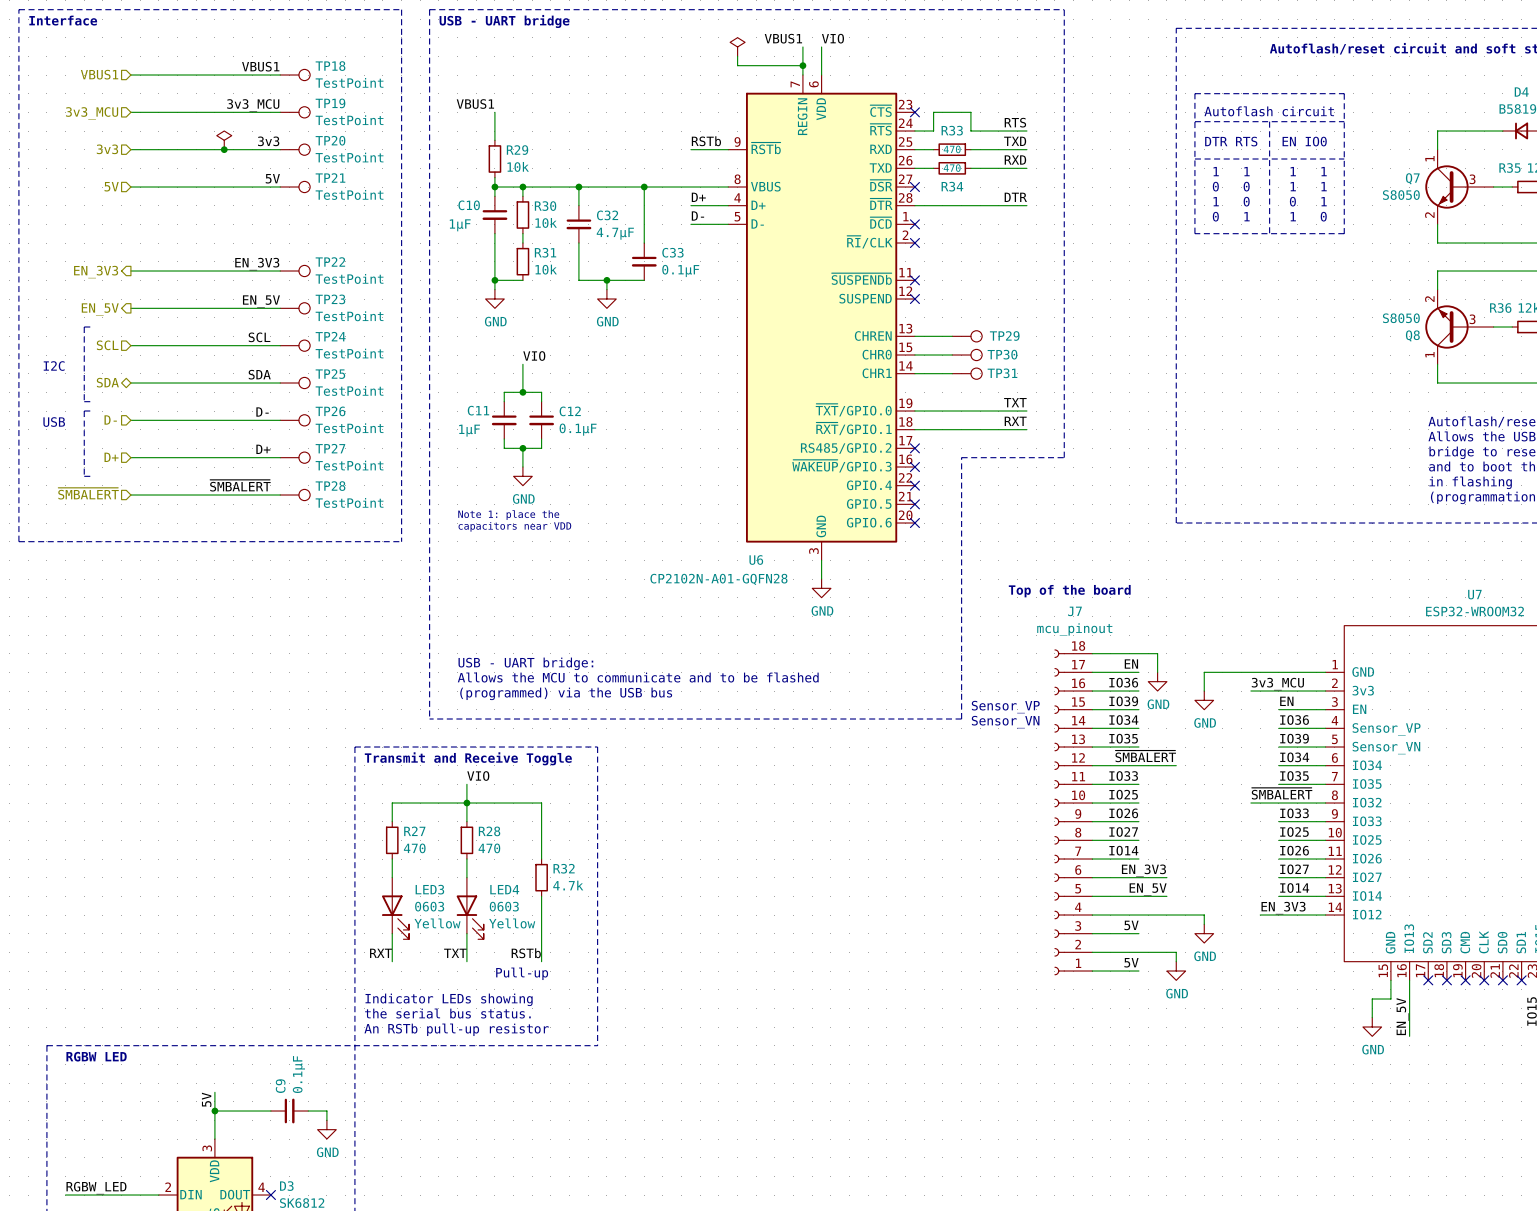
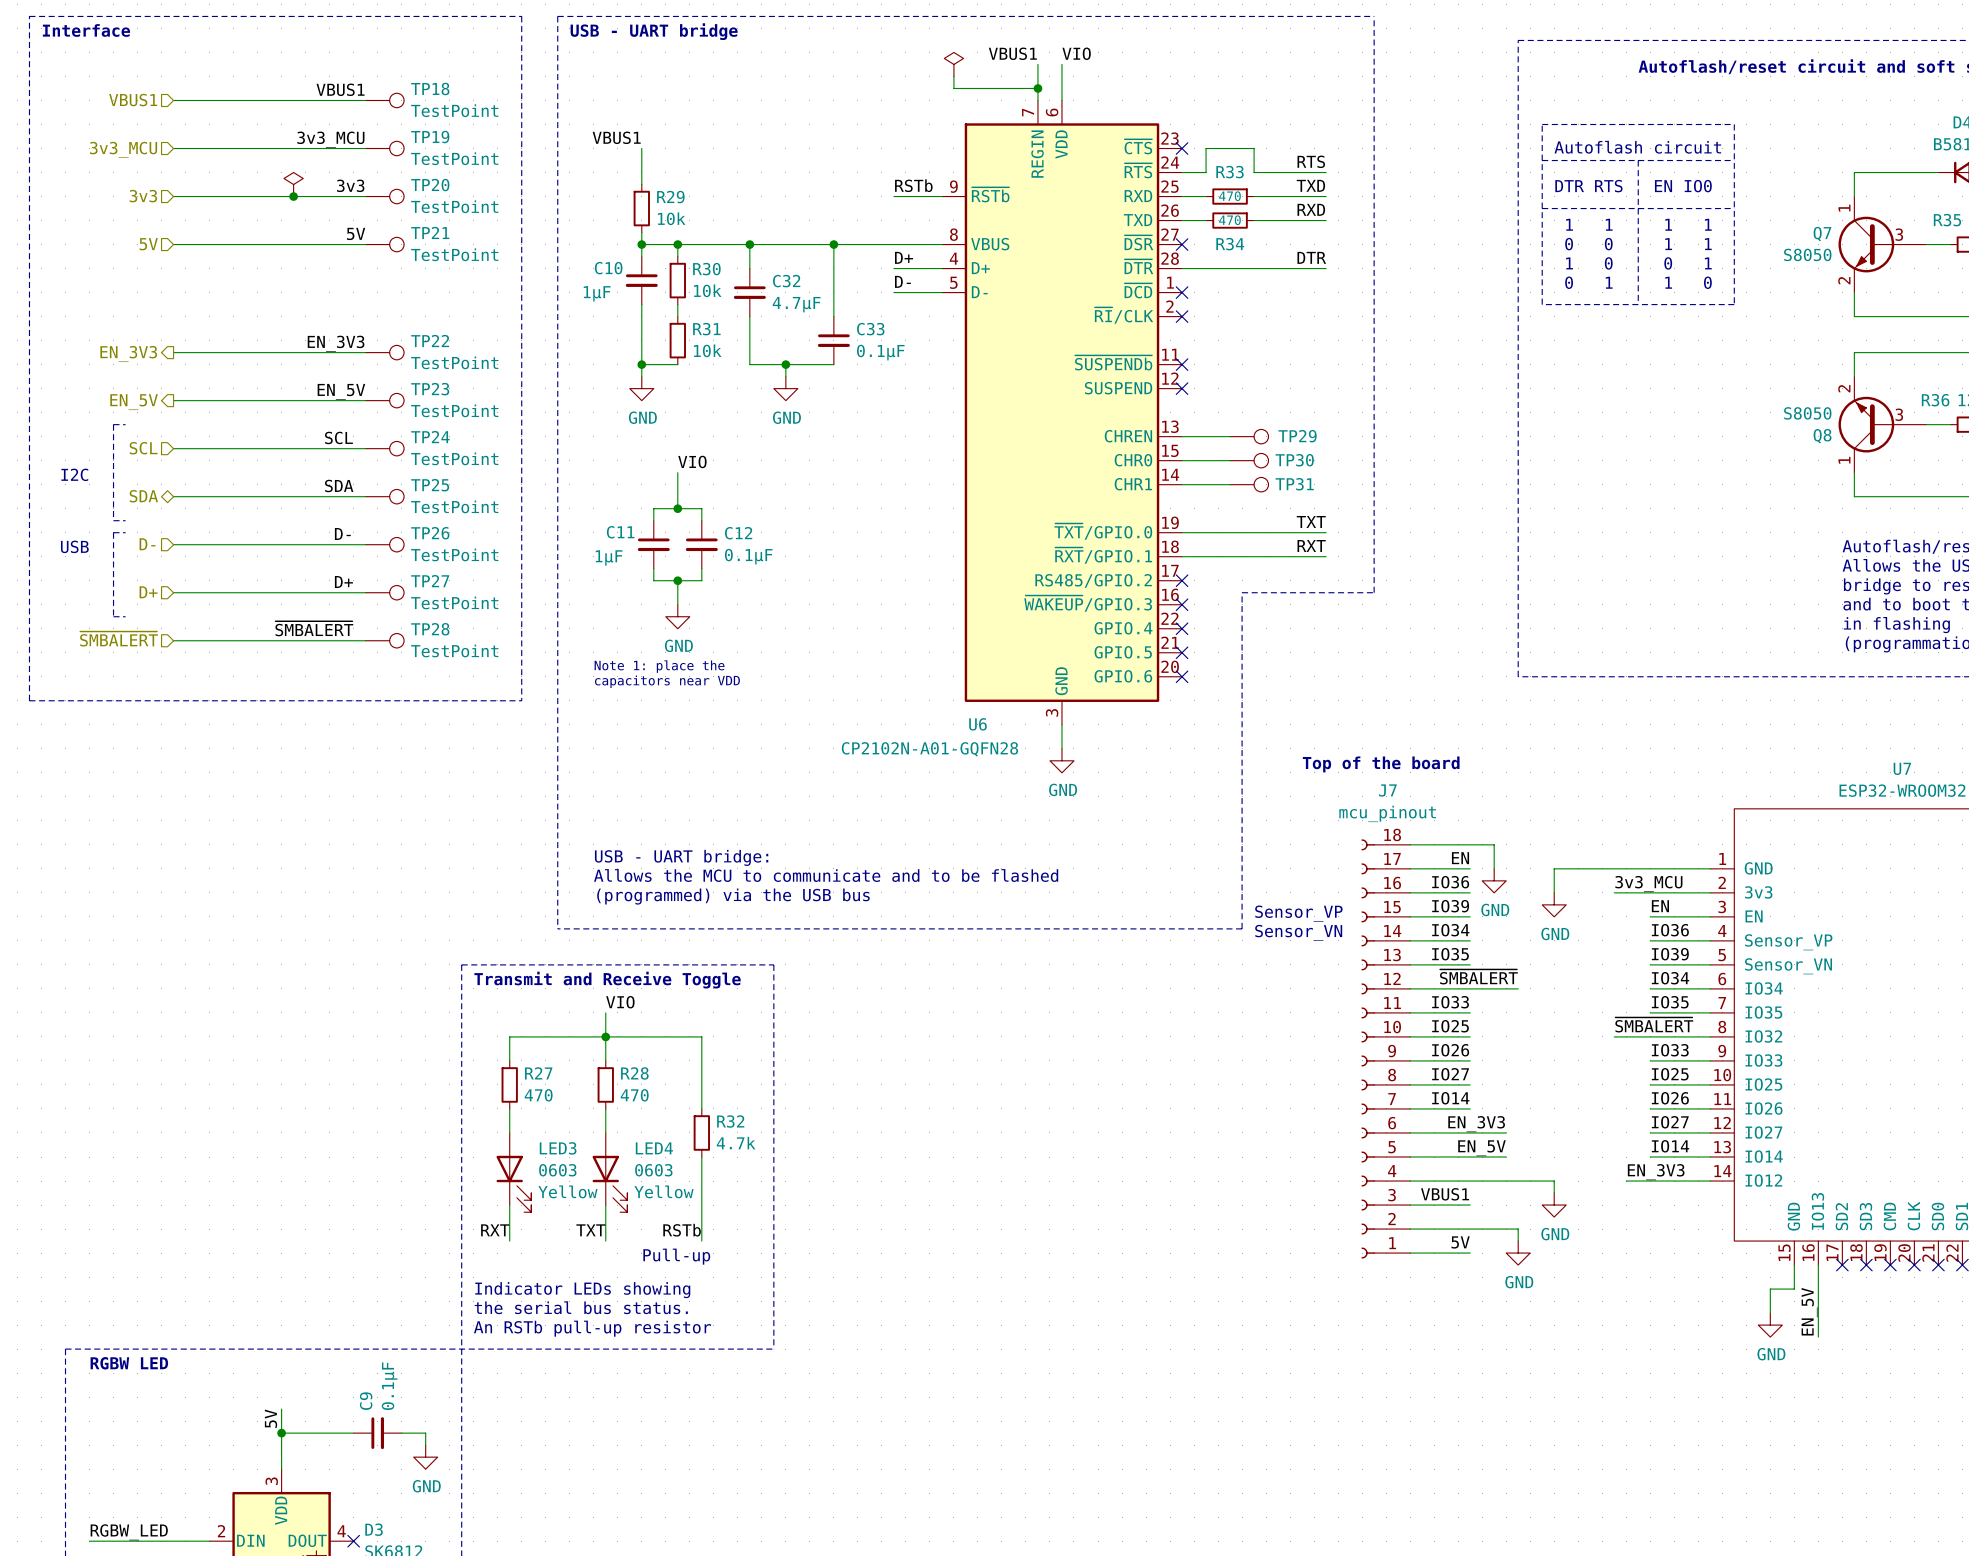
label: 5V (1131, 925) -> VBUS1 (1445, 1194)

